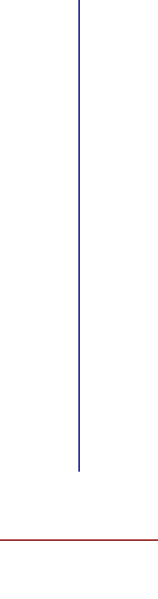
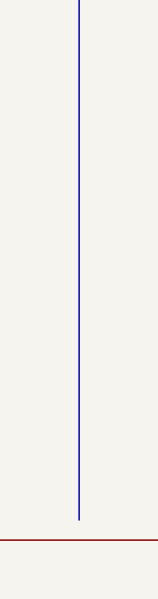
bus: none -> (79, 471) (79, 520)

